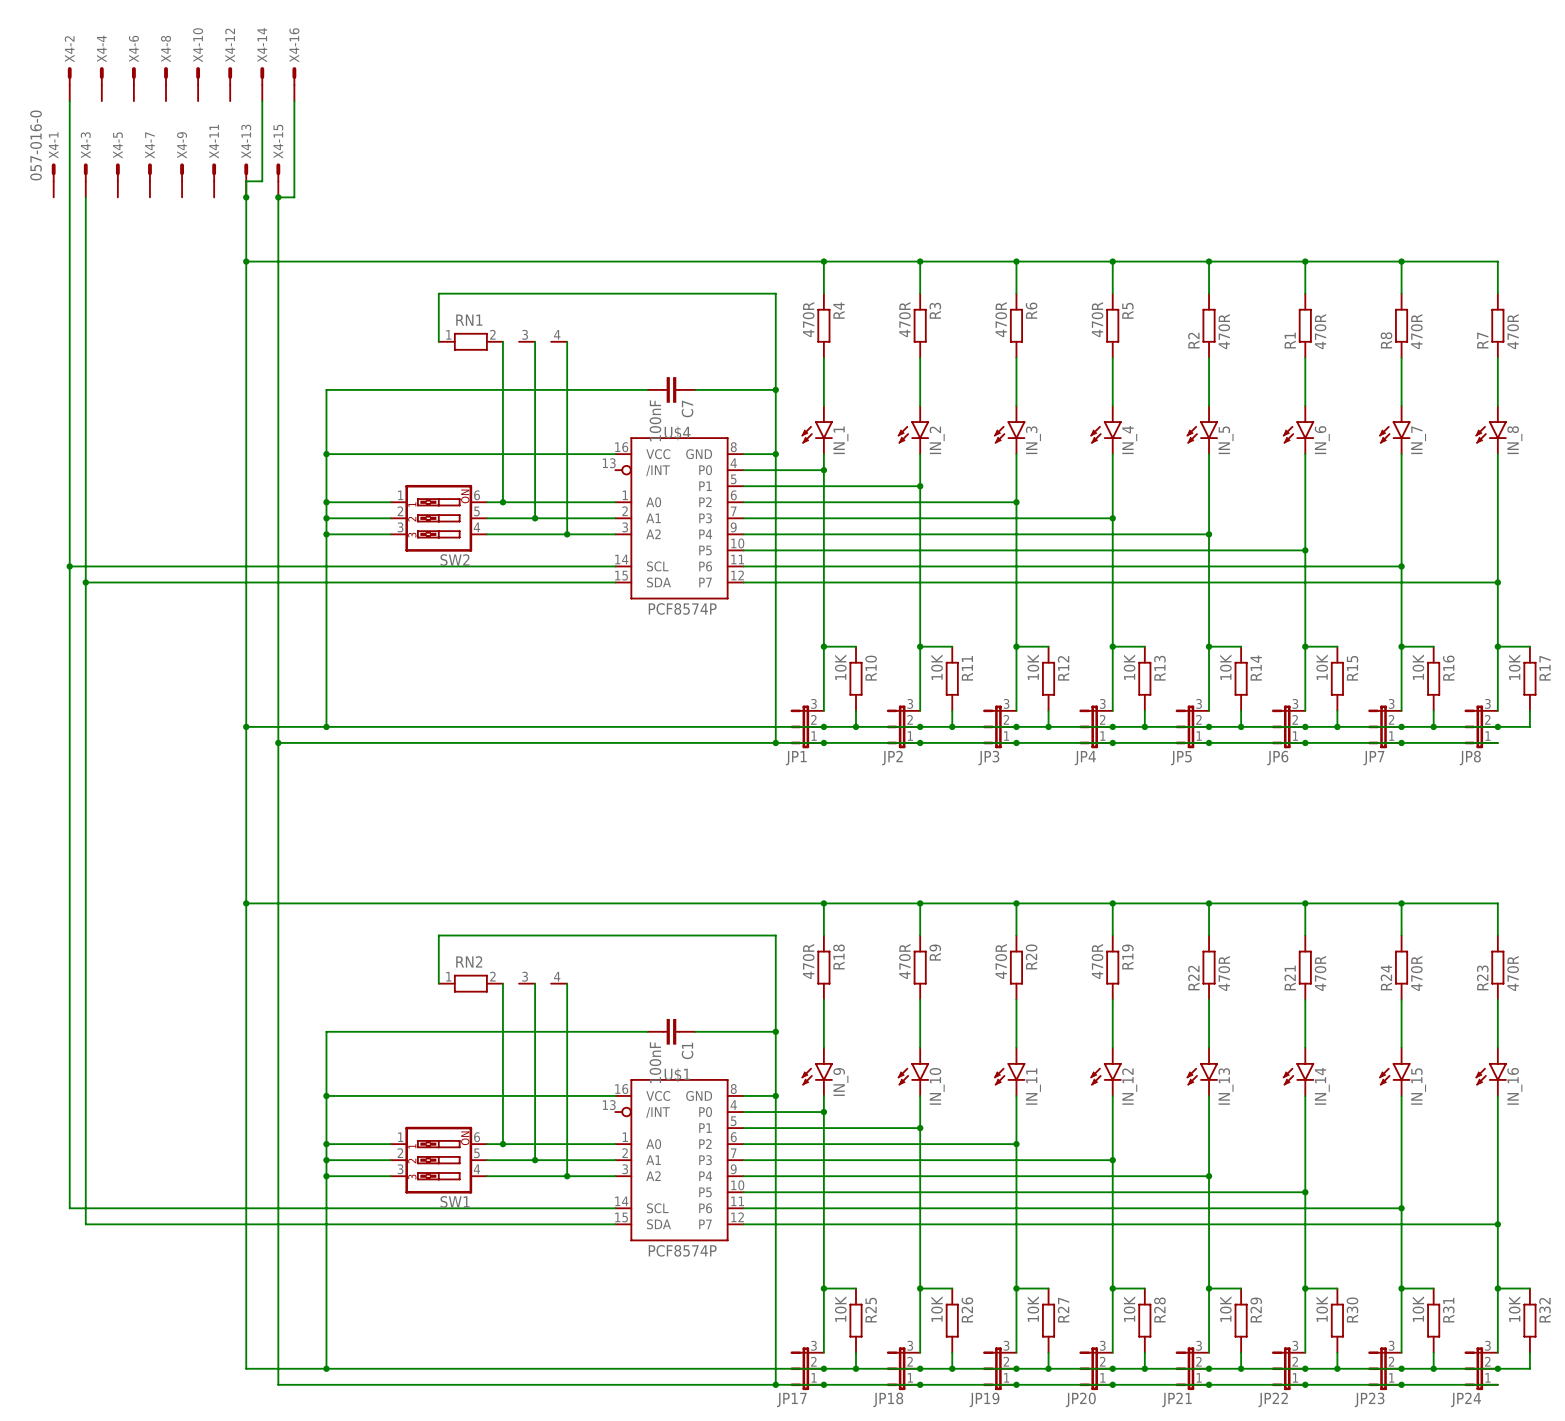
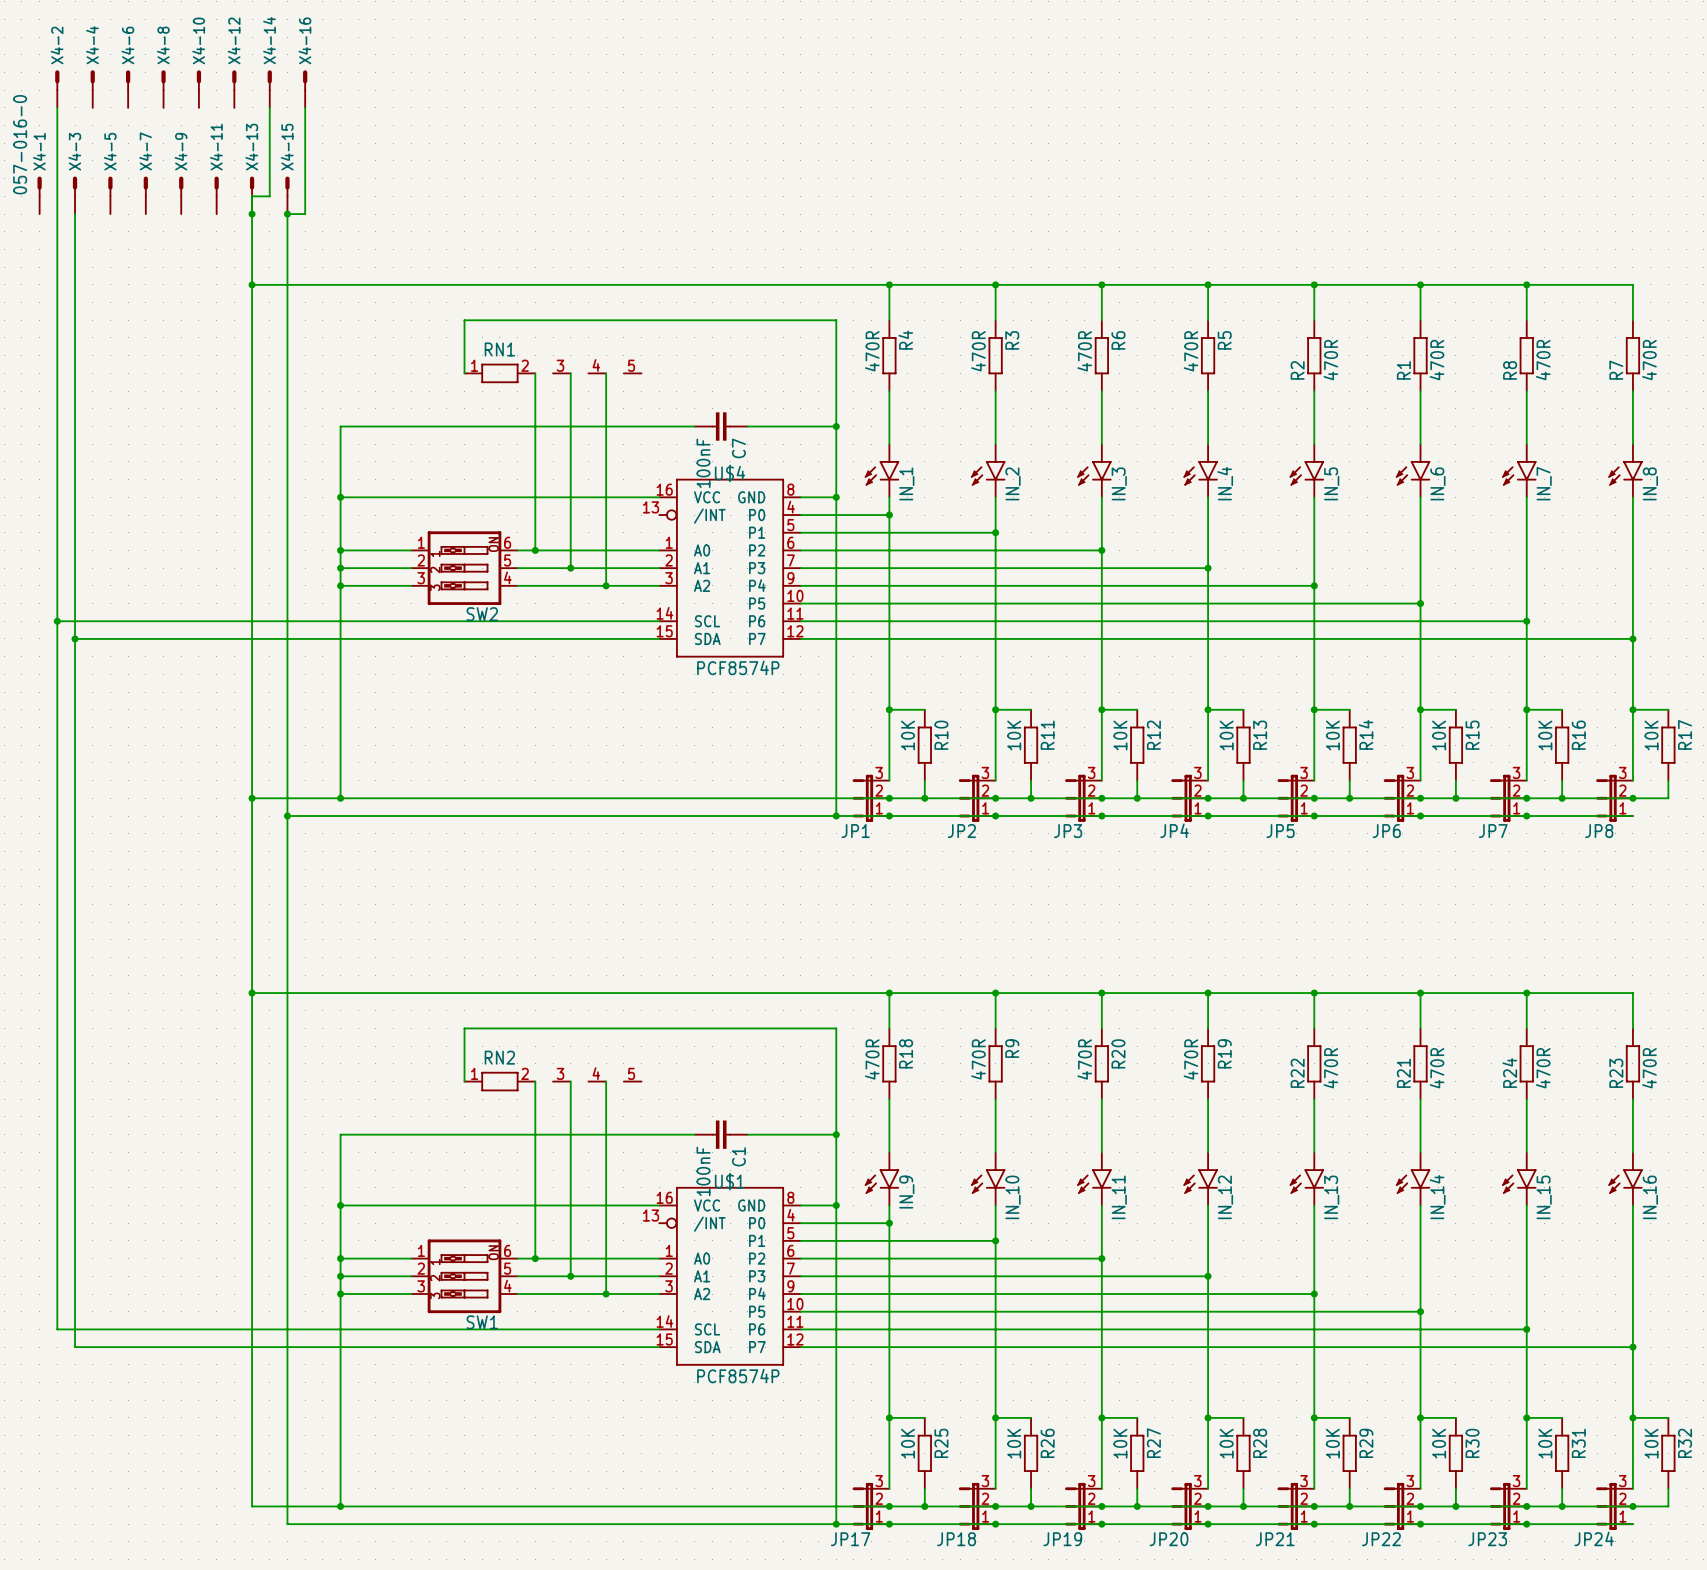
RN1 symbol: [438, 332, 568, 351] -> [464, 363, 642, 384]
RN2 symbol: [438, 974, 568, 993] -> [464, 1071, 642, 1092]

